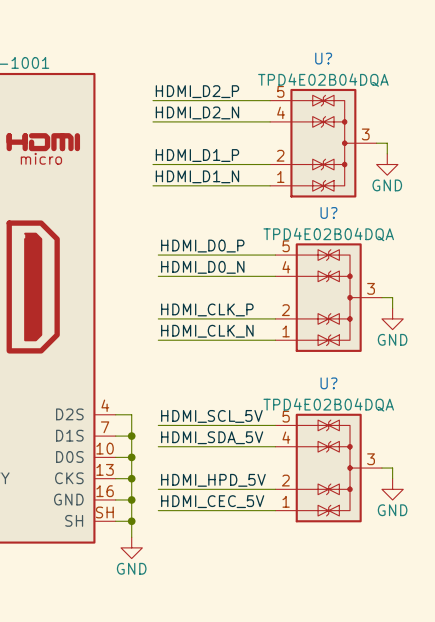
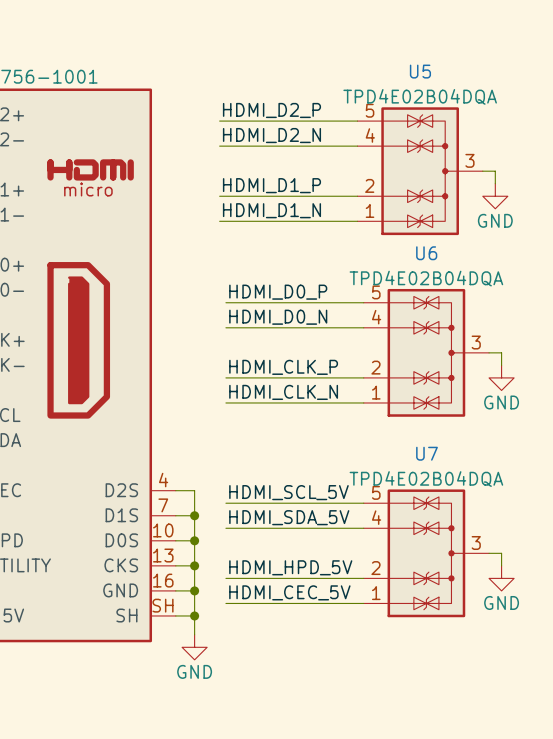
U? name: U? (323, 58) -> U5 (420, 71)
U? name: U? (328, 212) -> U6 (426, 253)
U? name: U? (328, 383) -> U7 (427, 453)

